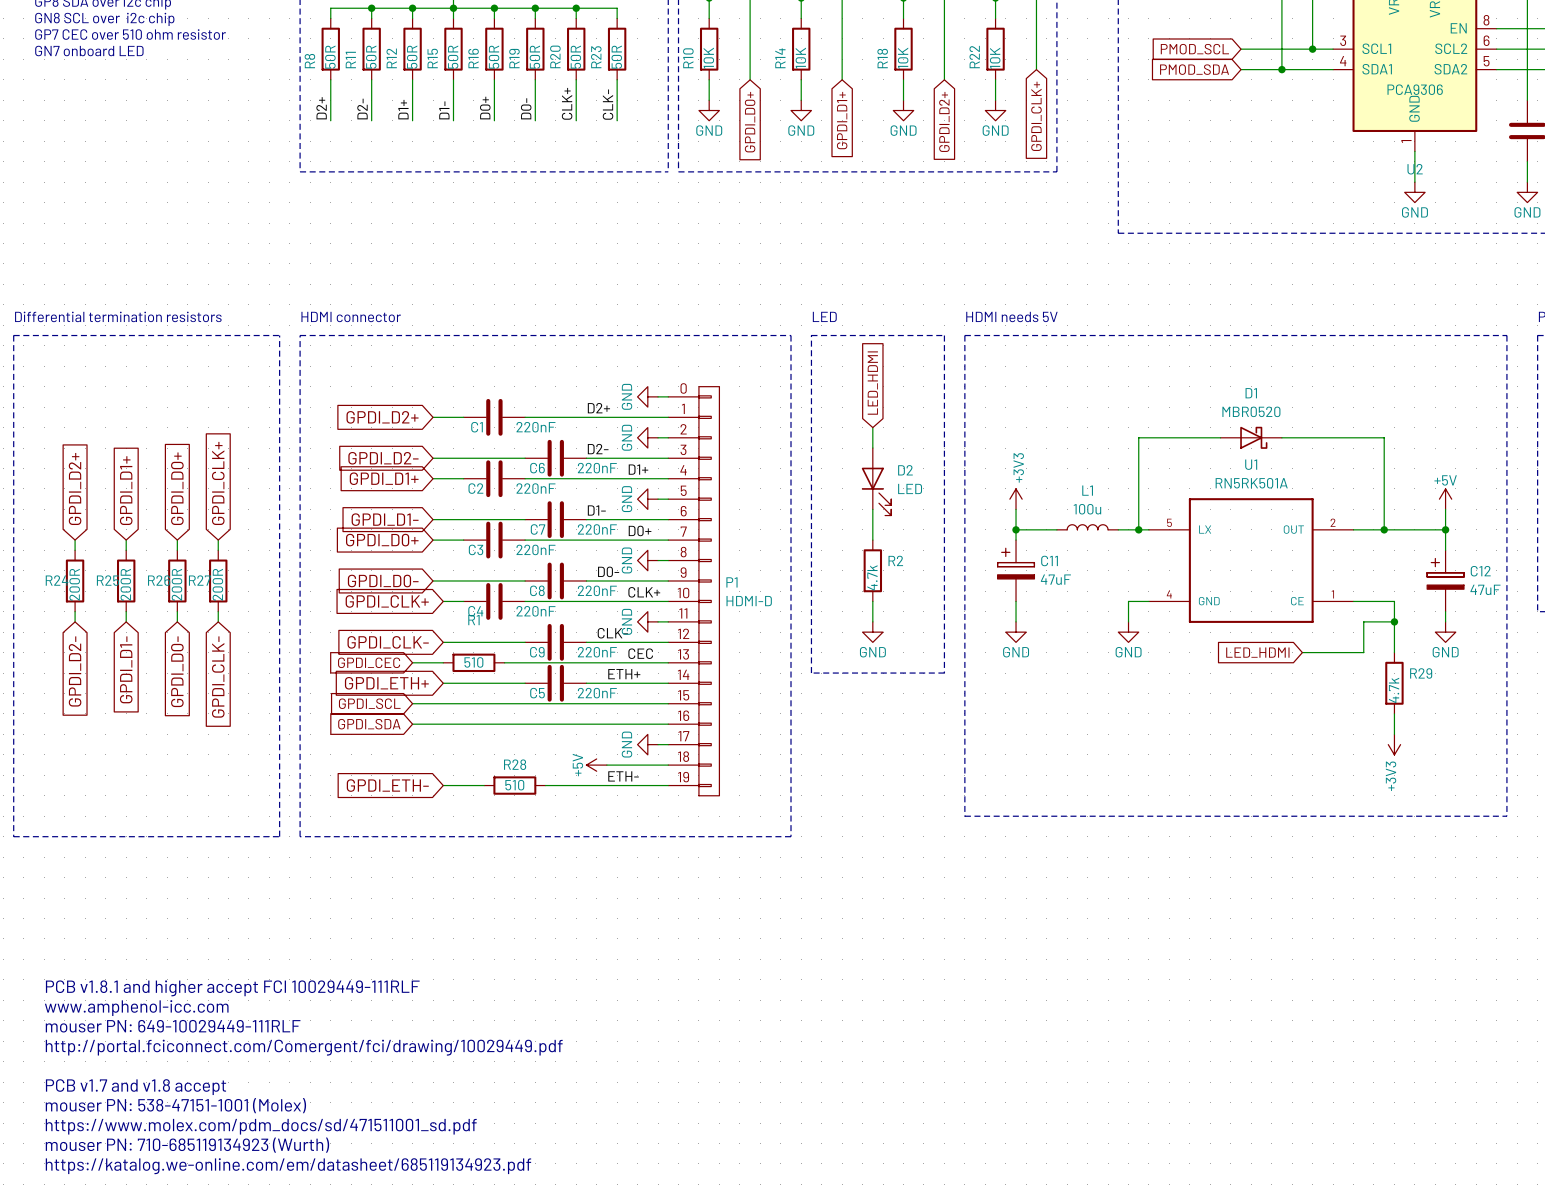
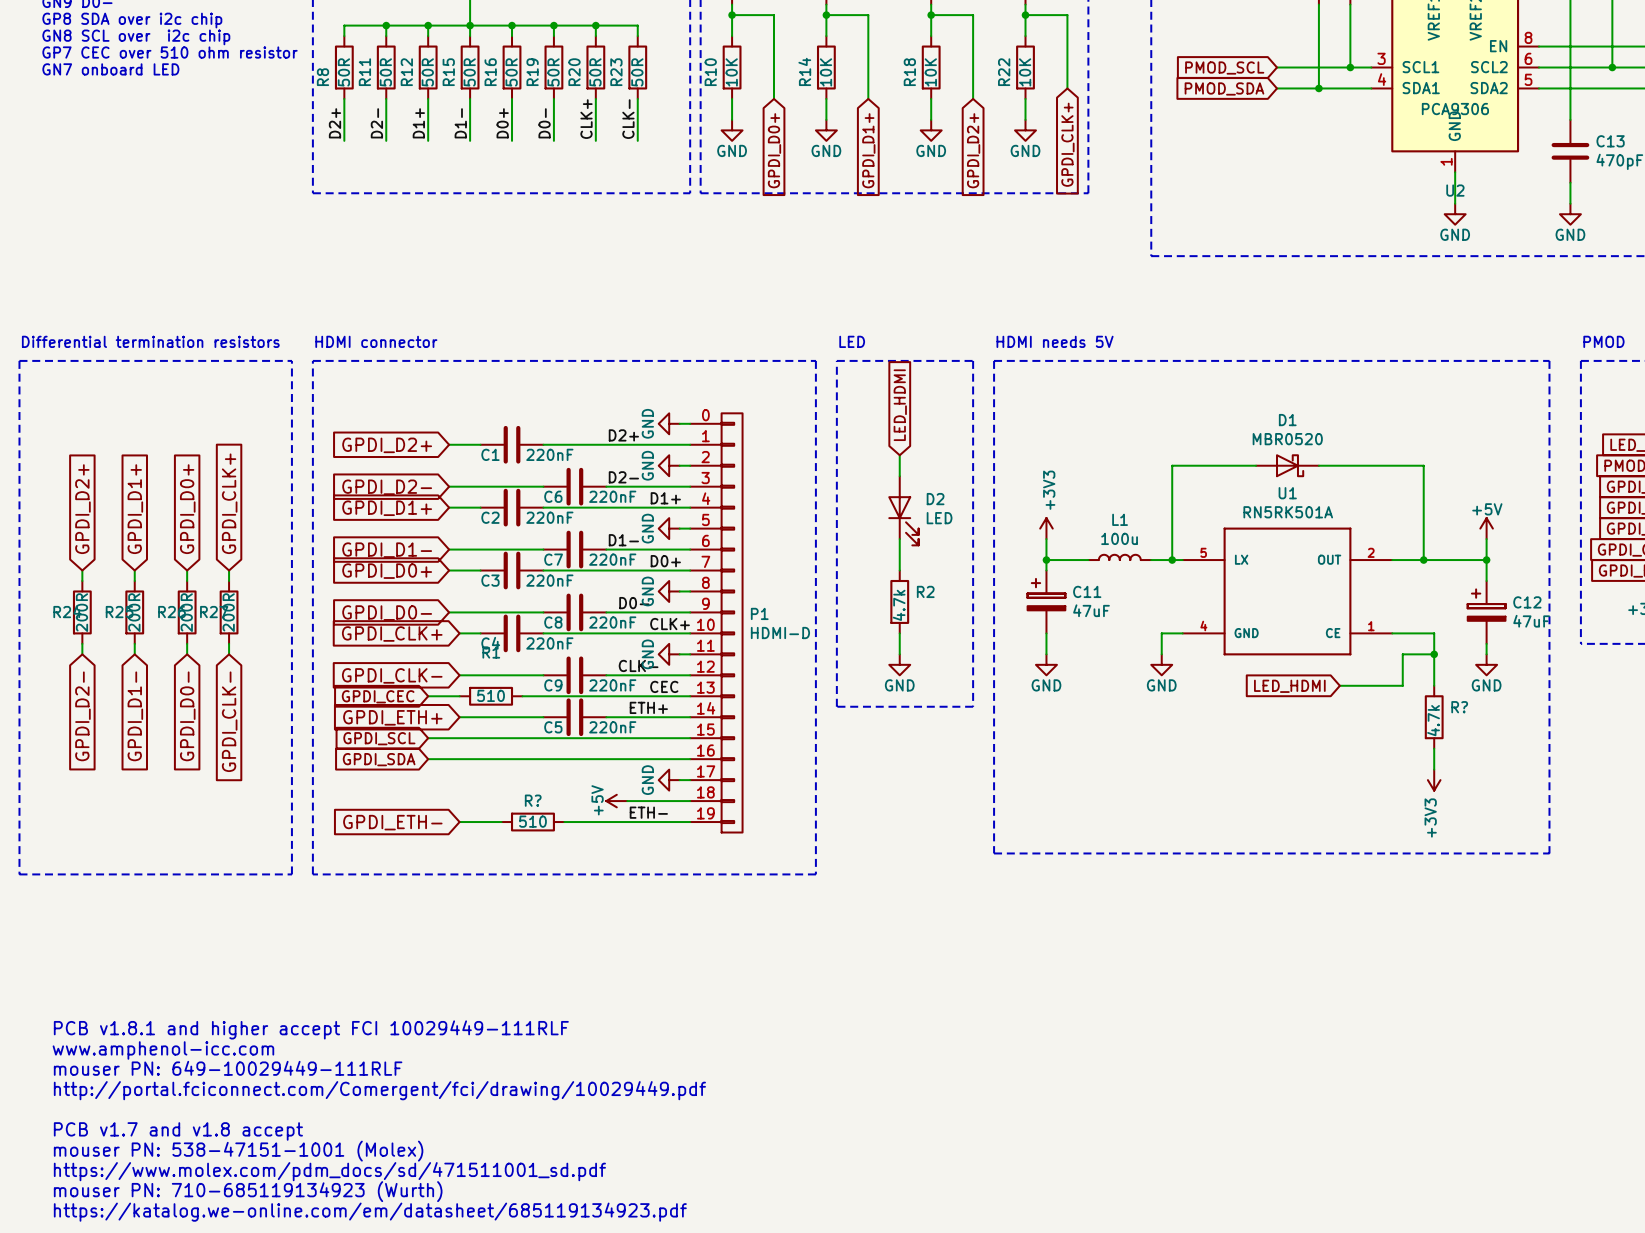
R29 name: R29 (1421, 673) -> R? (1459, 707)
R28 name: R28 (515, 764) -> R? (533, 800)

